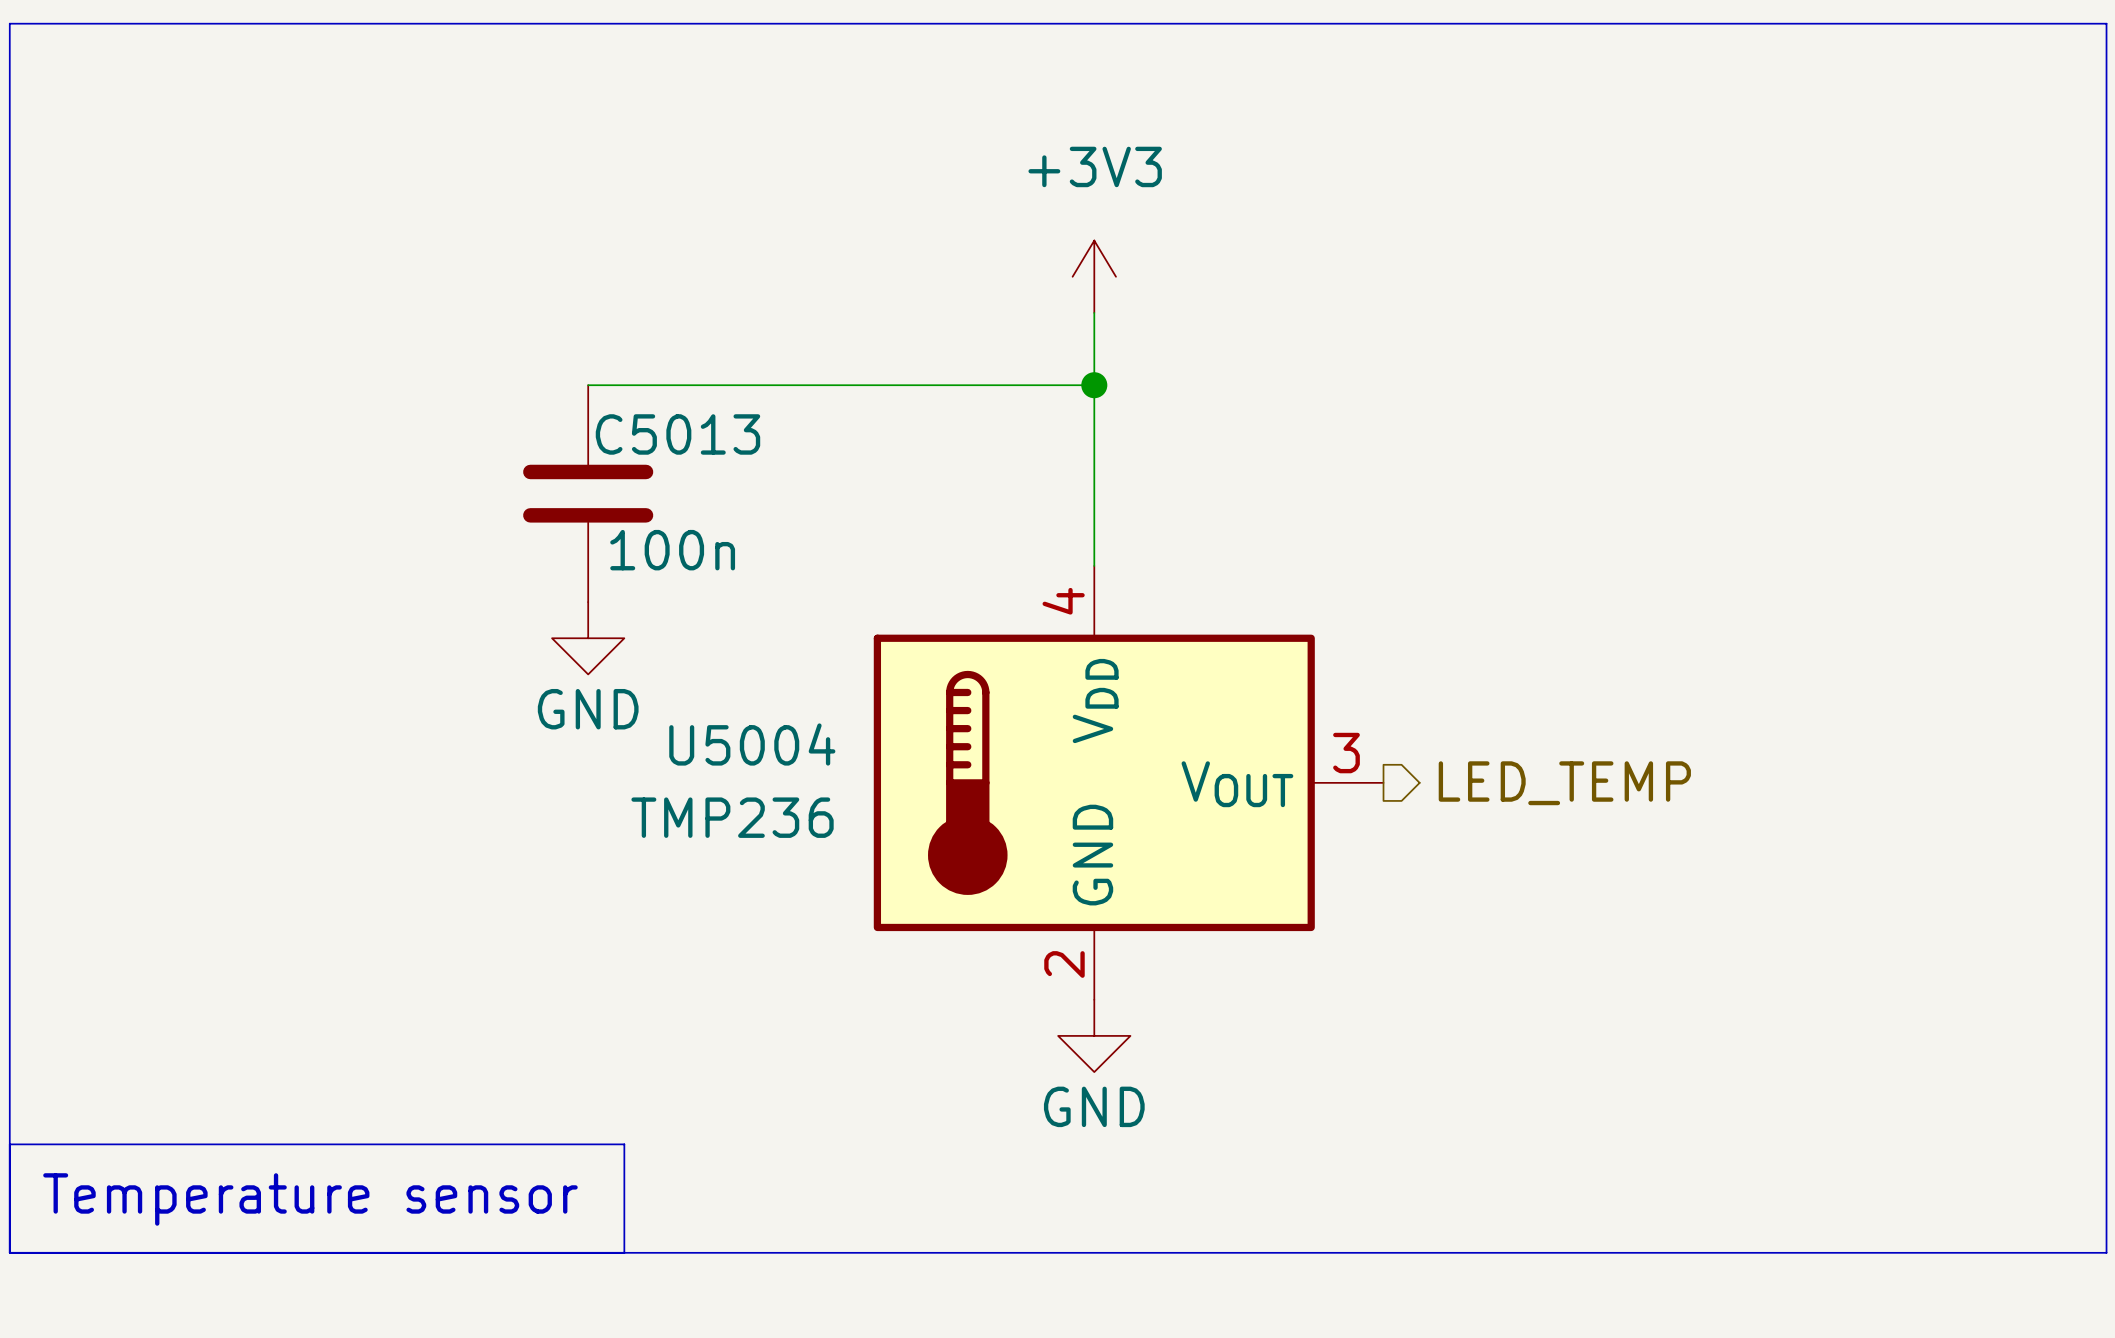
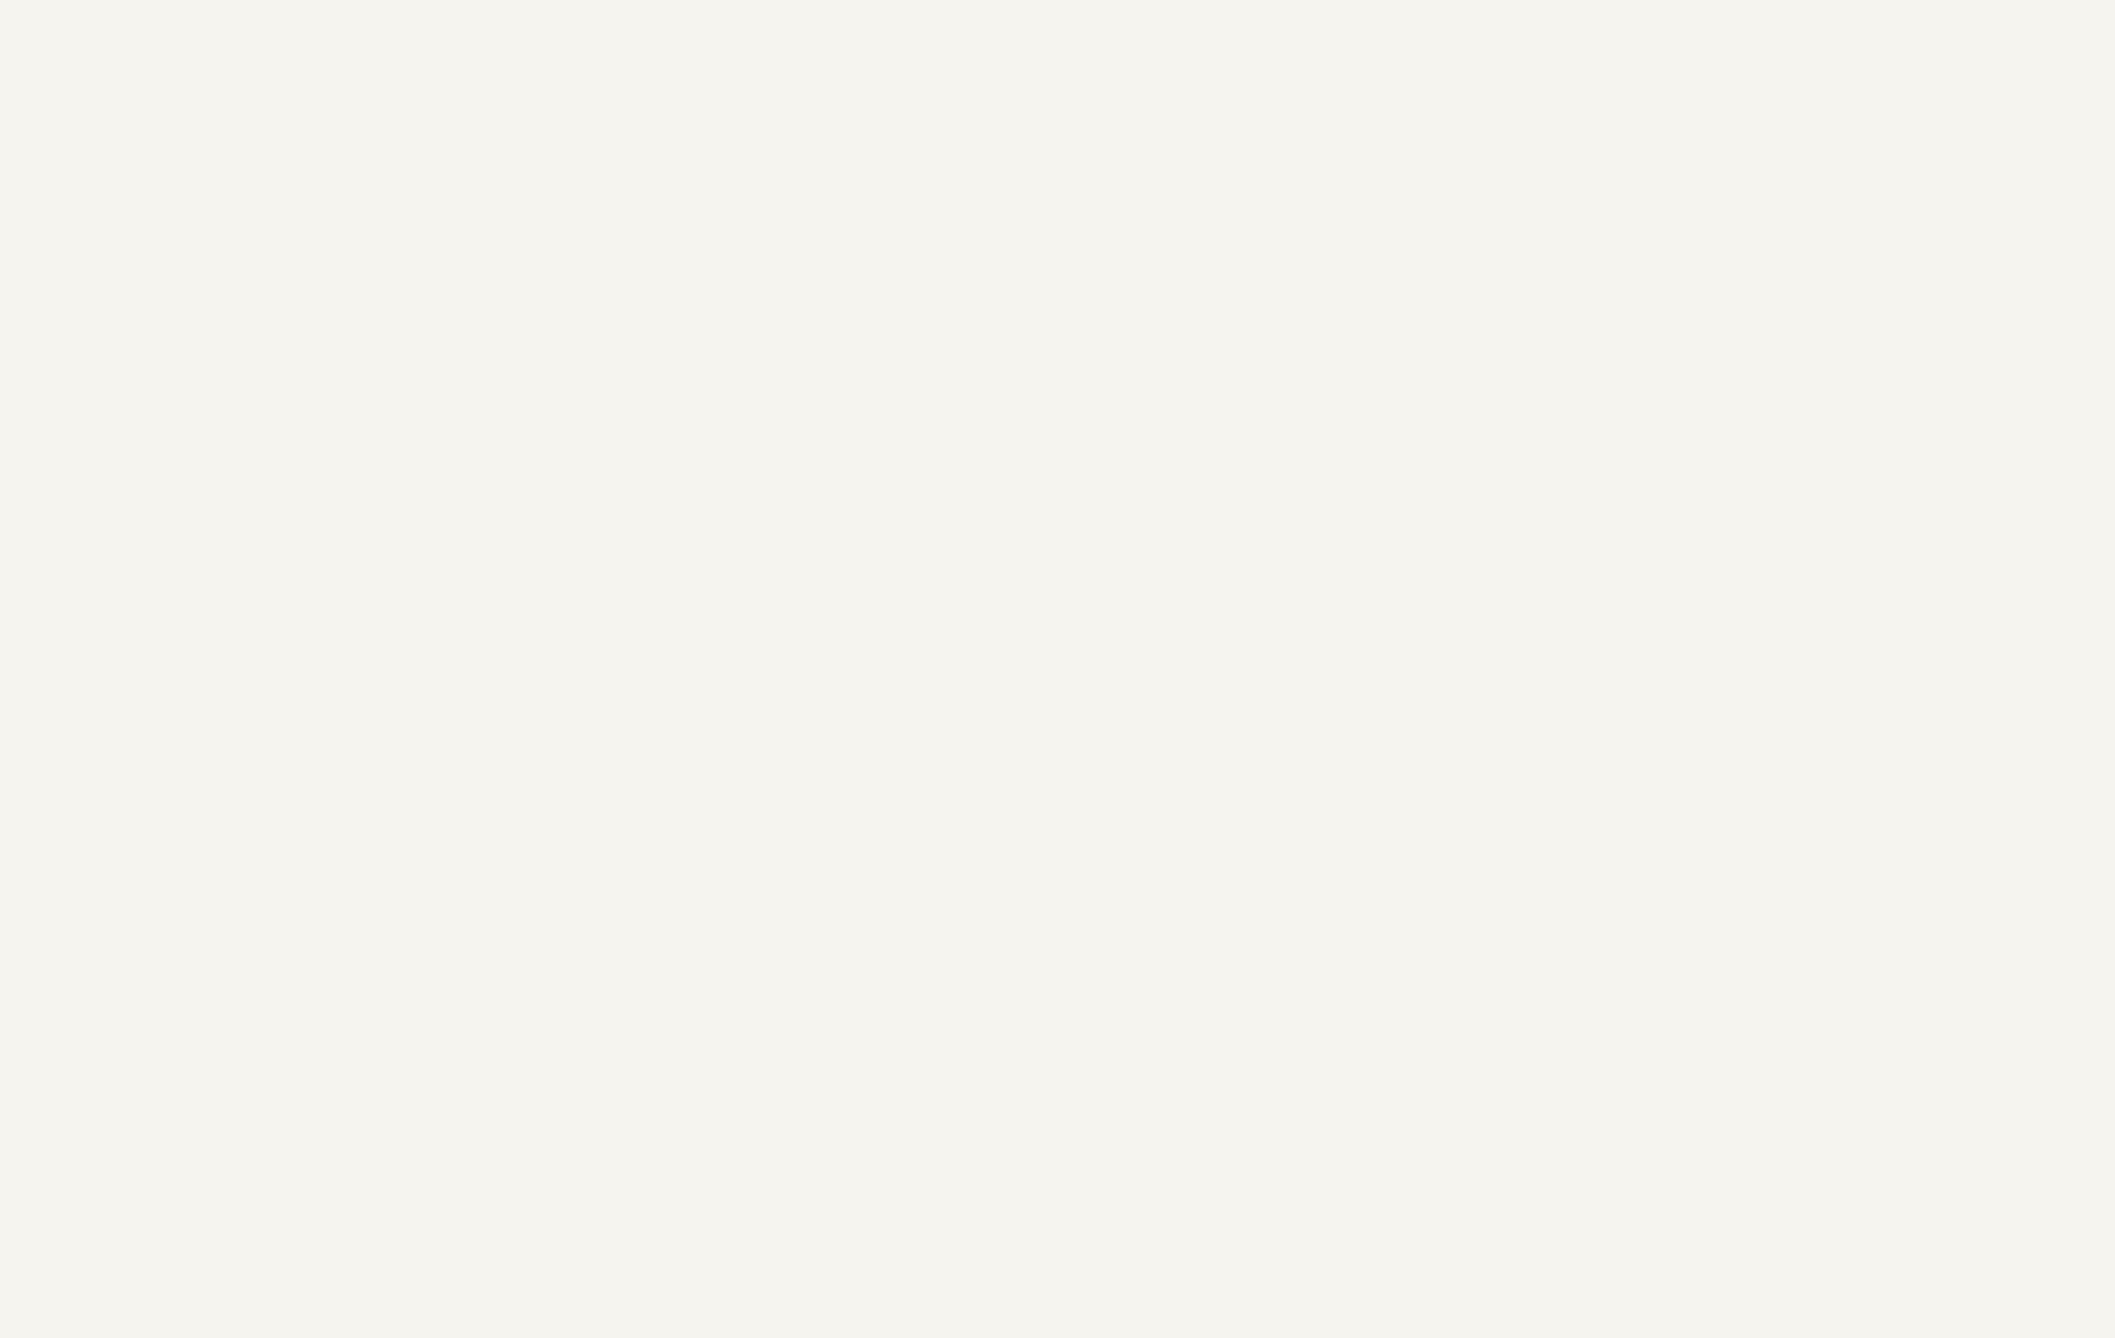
line: (9, 23) (2106, 23) (2106, 1252) (9, 1252) (9, 23) -> none
power symbol: +3V3 (1094, 276) -> none
wire: (1094, 312) (1094, 565) -> none
wire: (588, 385) (1094, 385) -> none
junction: (1094, 385) -> none
C5013: 100n (588, 493) -> none
power symbol: GND (588, 638) -> none
U5004: TMP236 (1128, 782) -> none
hierarchical label: LED_TEMP (1564, 783) -> none
power symbol: GND (1094, 1035) -> none
line: (9, 1144) (624, 1144) (624, 1252) -> none
text: Temperature sensor (310, 1199) -> none

